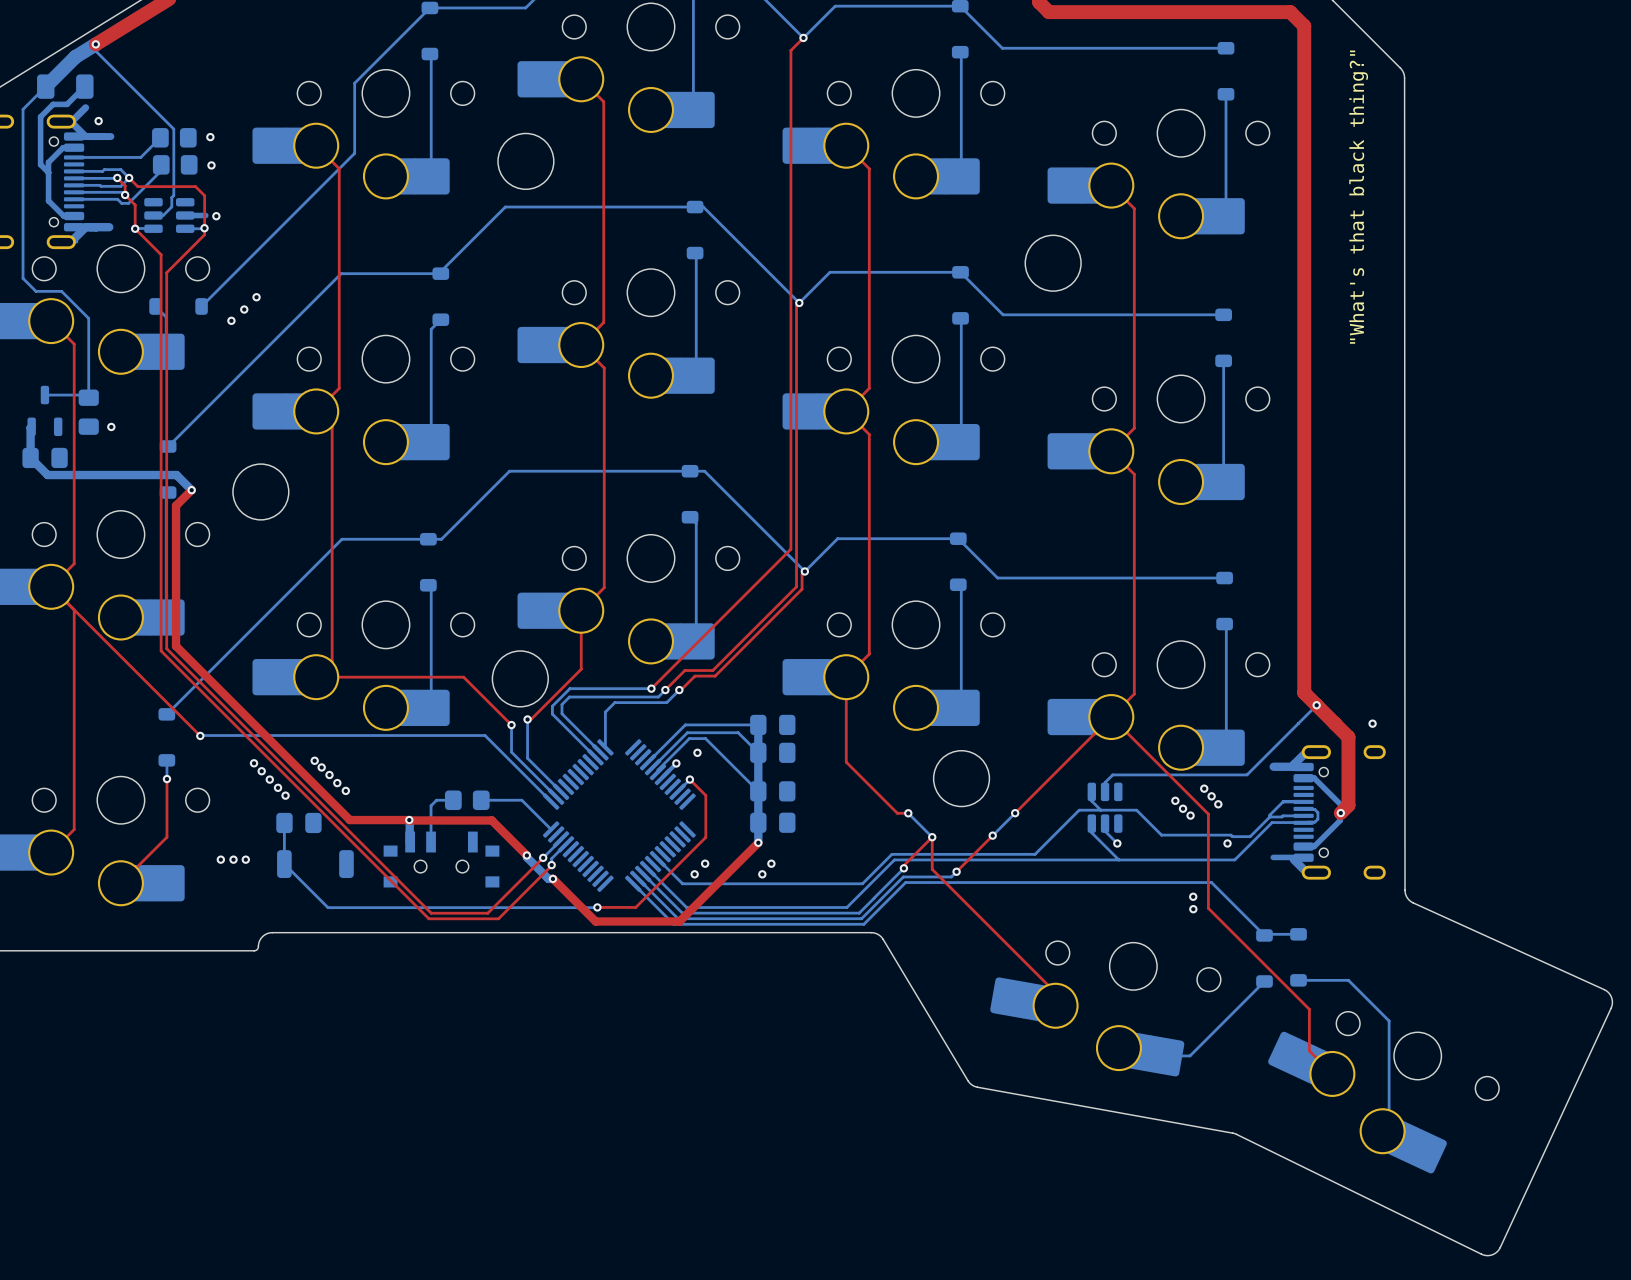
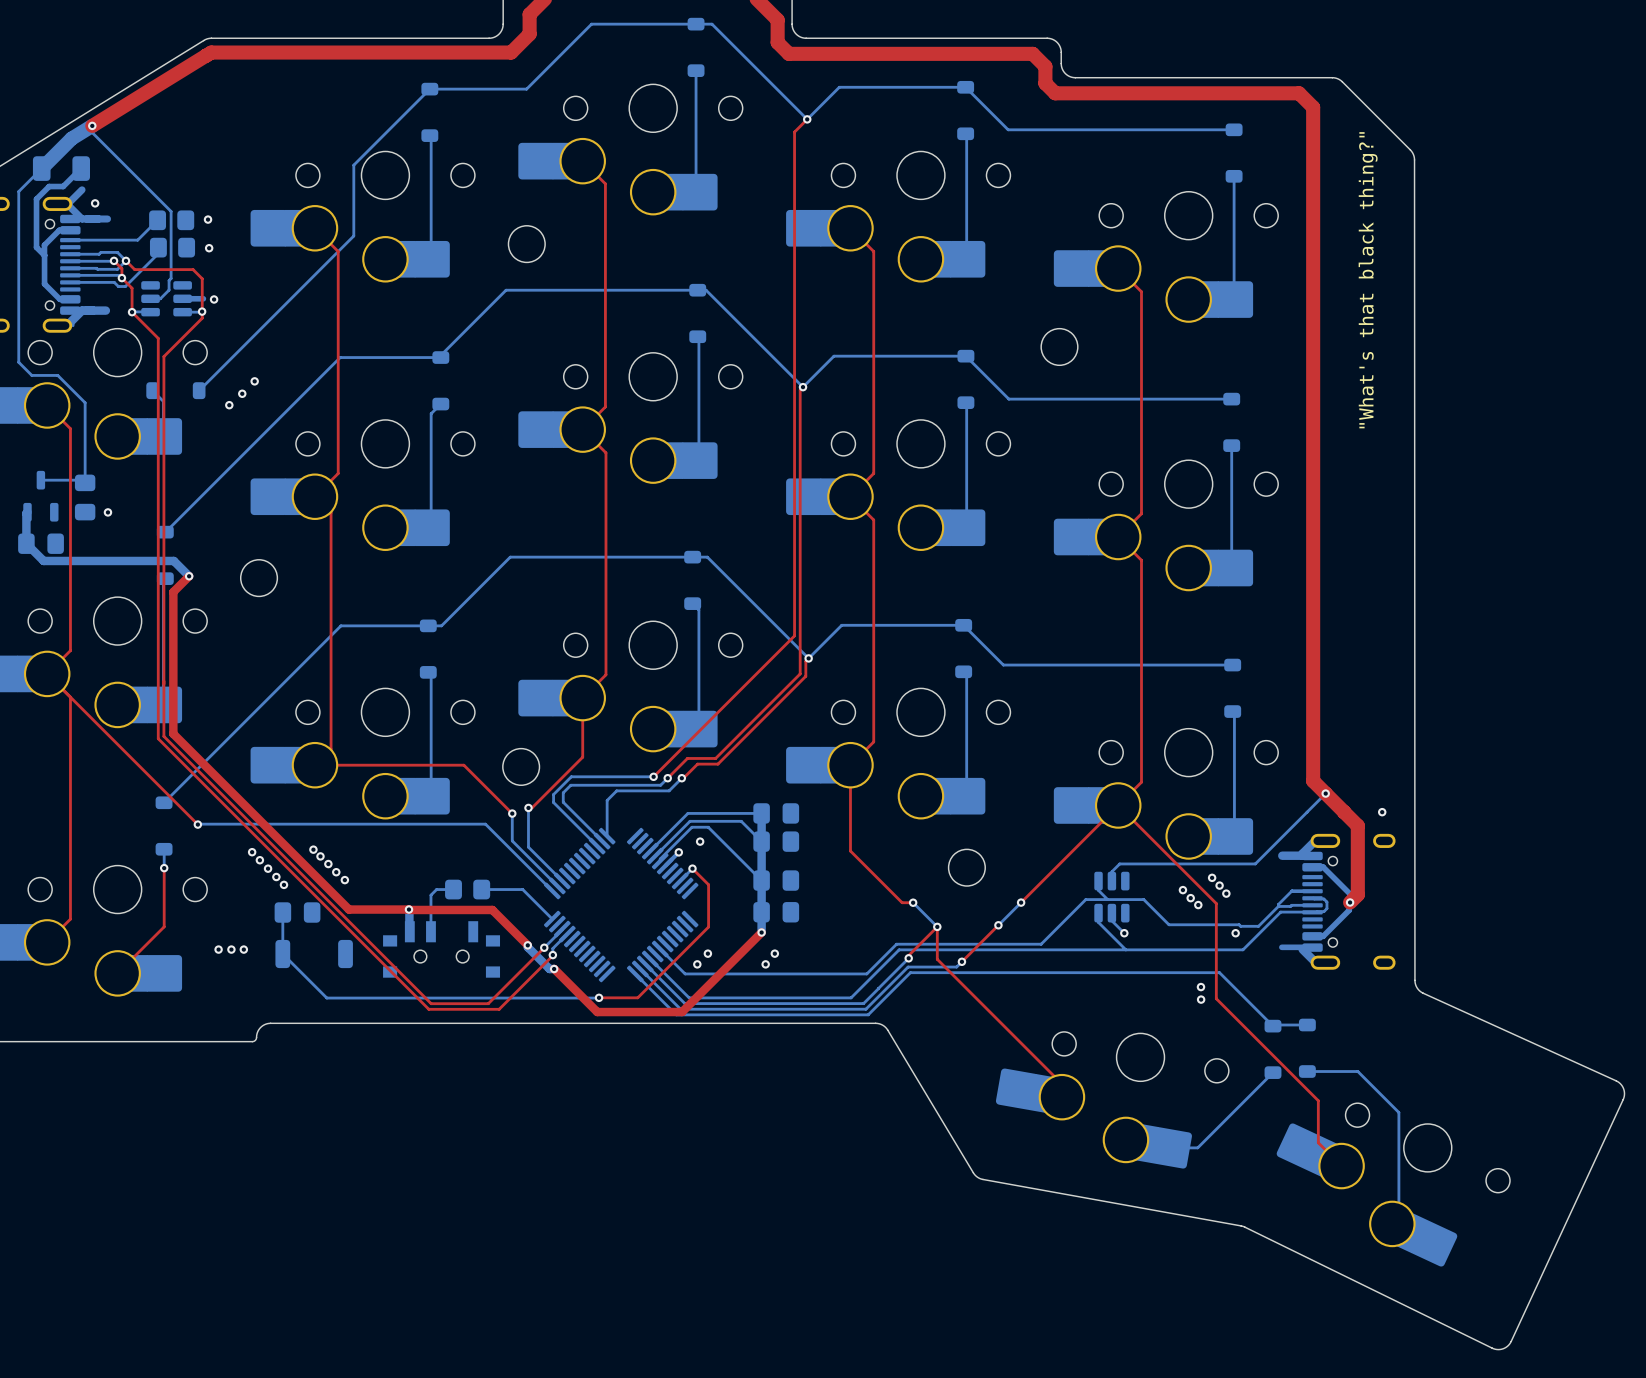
round board edge size: [497, 133, 555, 190] -> [508, 225, 546, 263]
round board edge size: [1024, 234, 1082, 292] -> [1040, 328, 1079, 366]
round board edge size: [232, 463, 290, 521] -> [240, 559, 278, 597]
round board edge size: [492, 650, 549, 708] -> [502, 748, 540, 786]
round board edge size: [933, 750, 990, 807] -> [948, 849, 986, 887]

